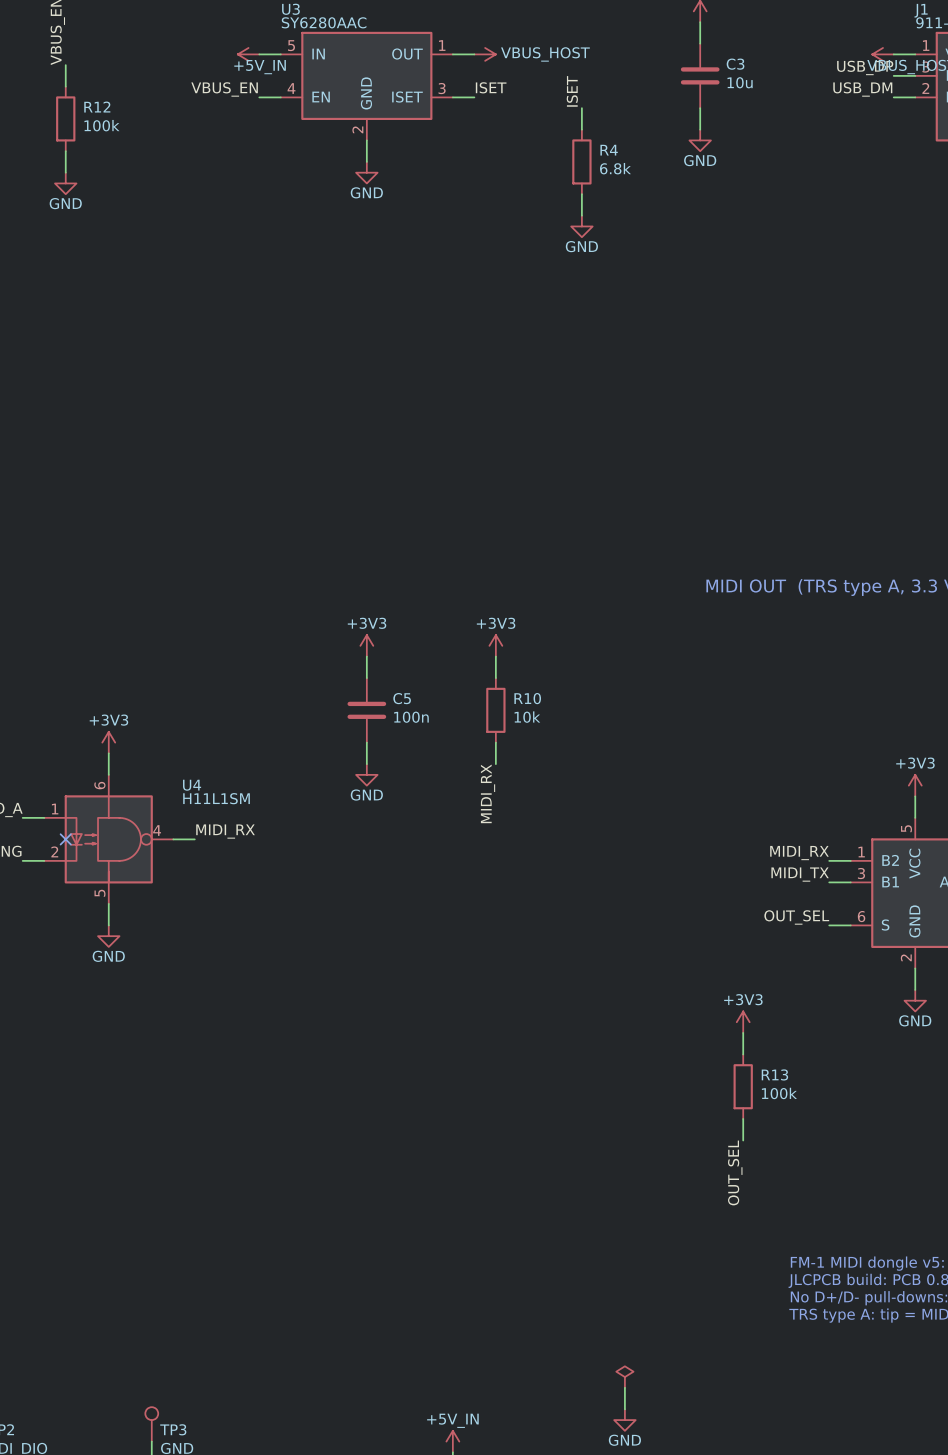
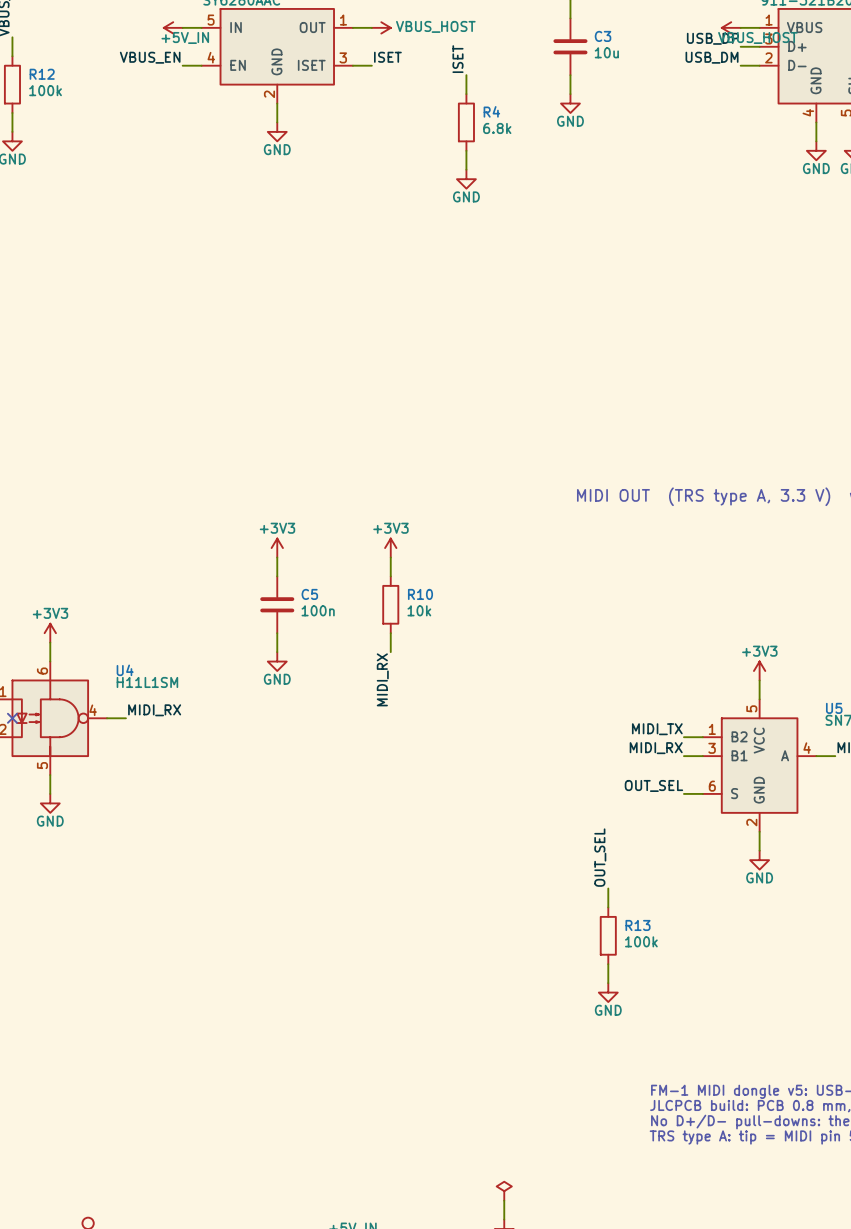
label: MIDI_RX (799, 853) -> MIDI_TX (657, 729)
label: MIDI_TX (800, 874) -> MIDI_RX (656, 748)
power symbol: +3V3 (743, 1022) -> none
power symbol: none -> GND (608, 992)
label position: OUT_SEL (735, 1172) -> OUT_SEL (600, 857)

